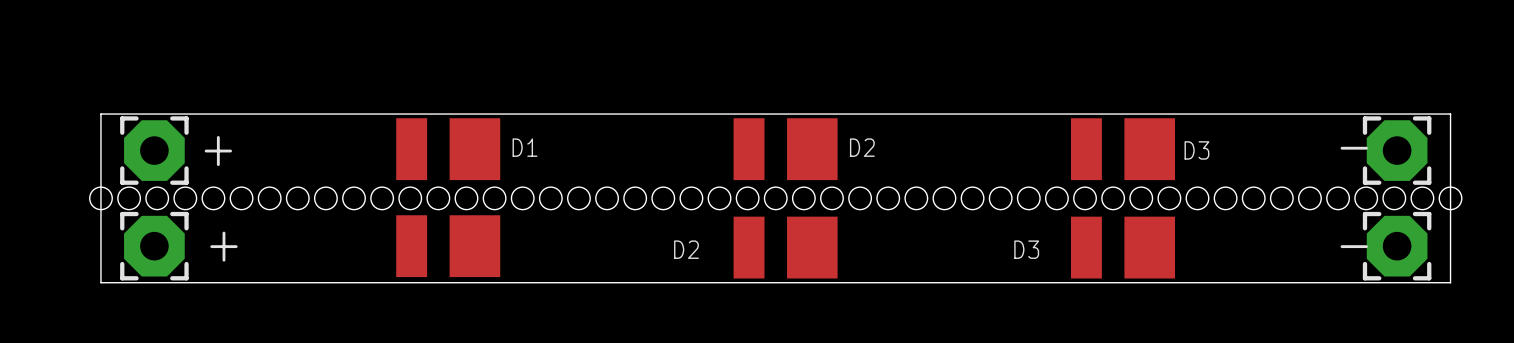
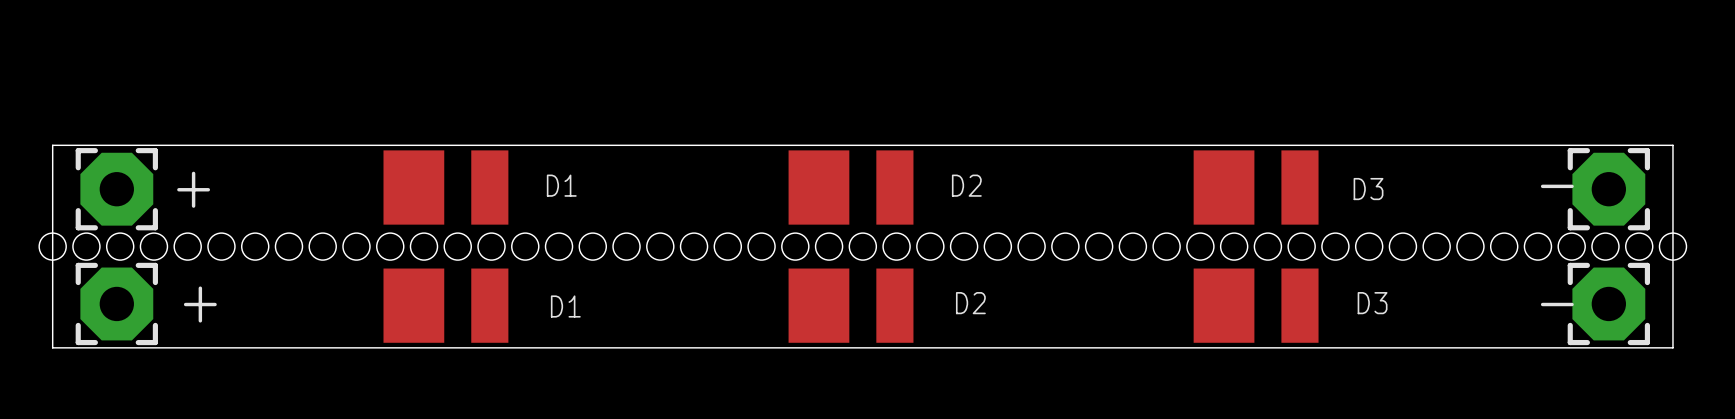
part rotation: 0° (448, 149) -> 180° (445, 187)
part rotation: 0° (785, 149) -> 180° (851, 187)
part rotation: 0° (1122, 149) -> 180° (1256, 187)
part: (448, 246) -> none
D1: none -> (445, 305)
D2 rotation: 0° (785, 247) -> 180° (851, 305)
D3 rotation: 0° (1122, 247) -> 180° (1256, 305)

